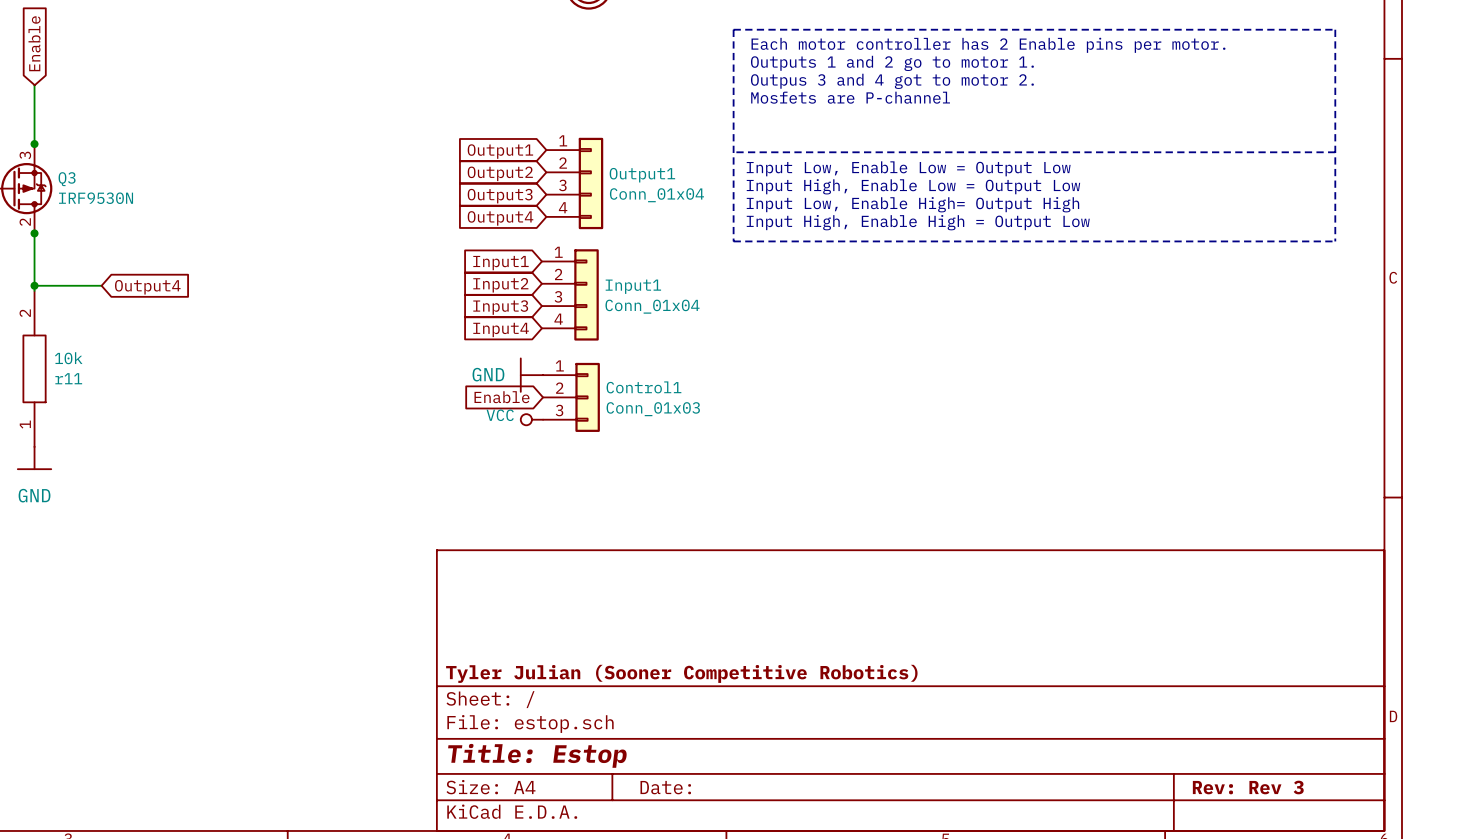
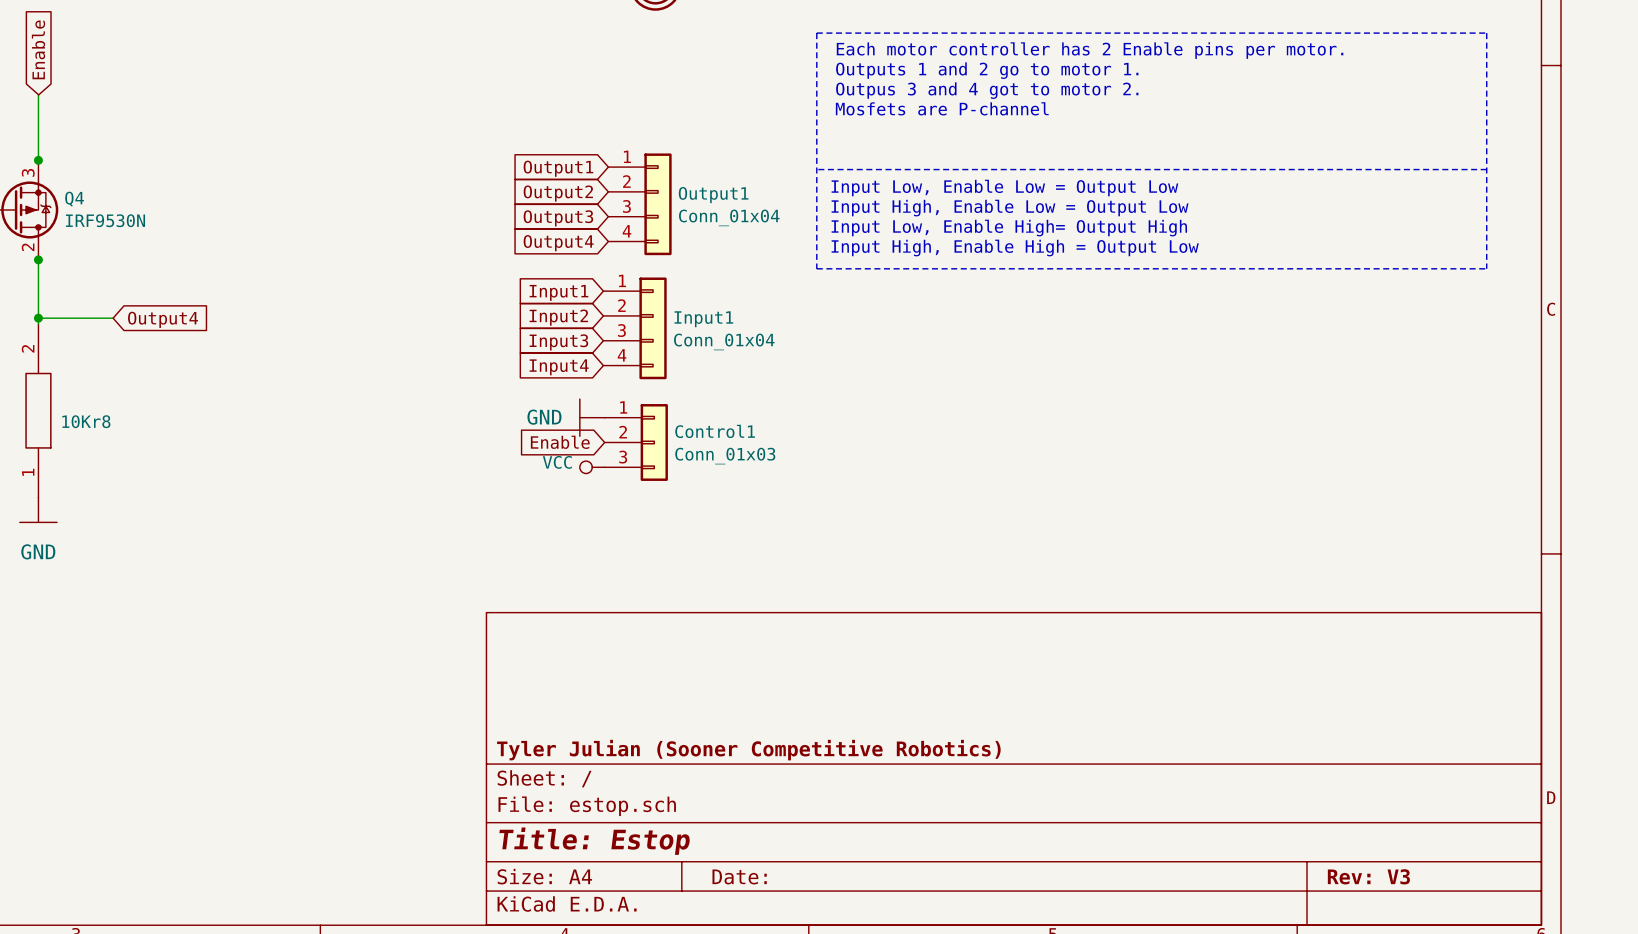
Q3 name: Q3 (67, 179) -> Q4 (74, 199)
r11 value: 10k (68, 358) -> none
r11 name: r11 (68, 378) -> 10Kr8 (86, 421)
title block: Rev: Rev 3 (1248, 787) -> Rev: V3 (1368, 876)

